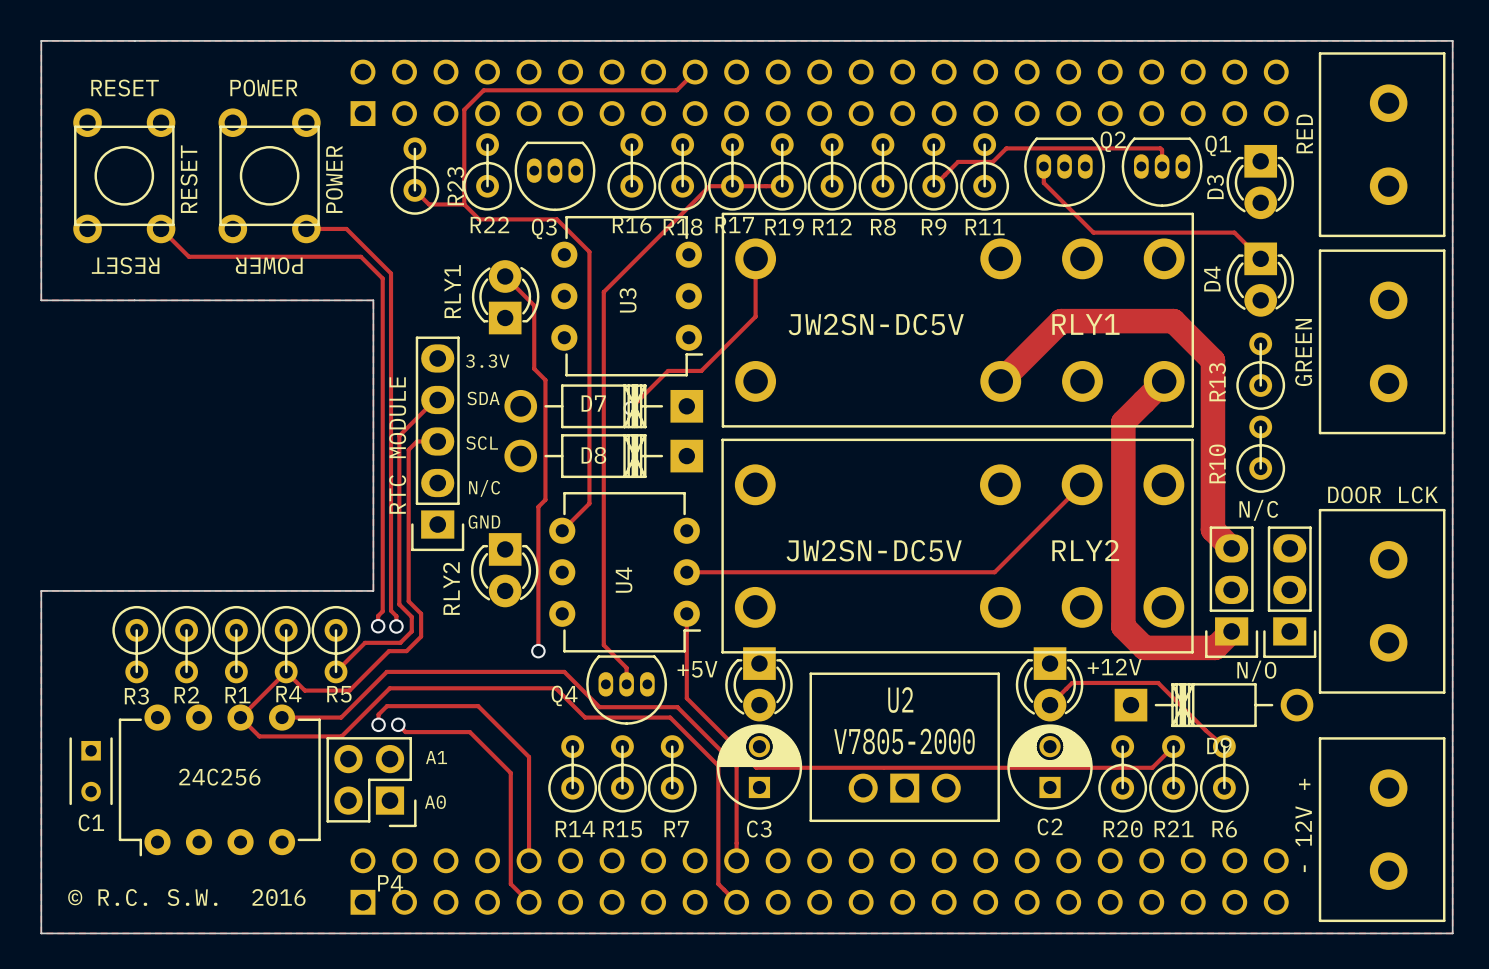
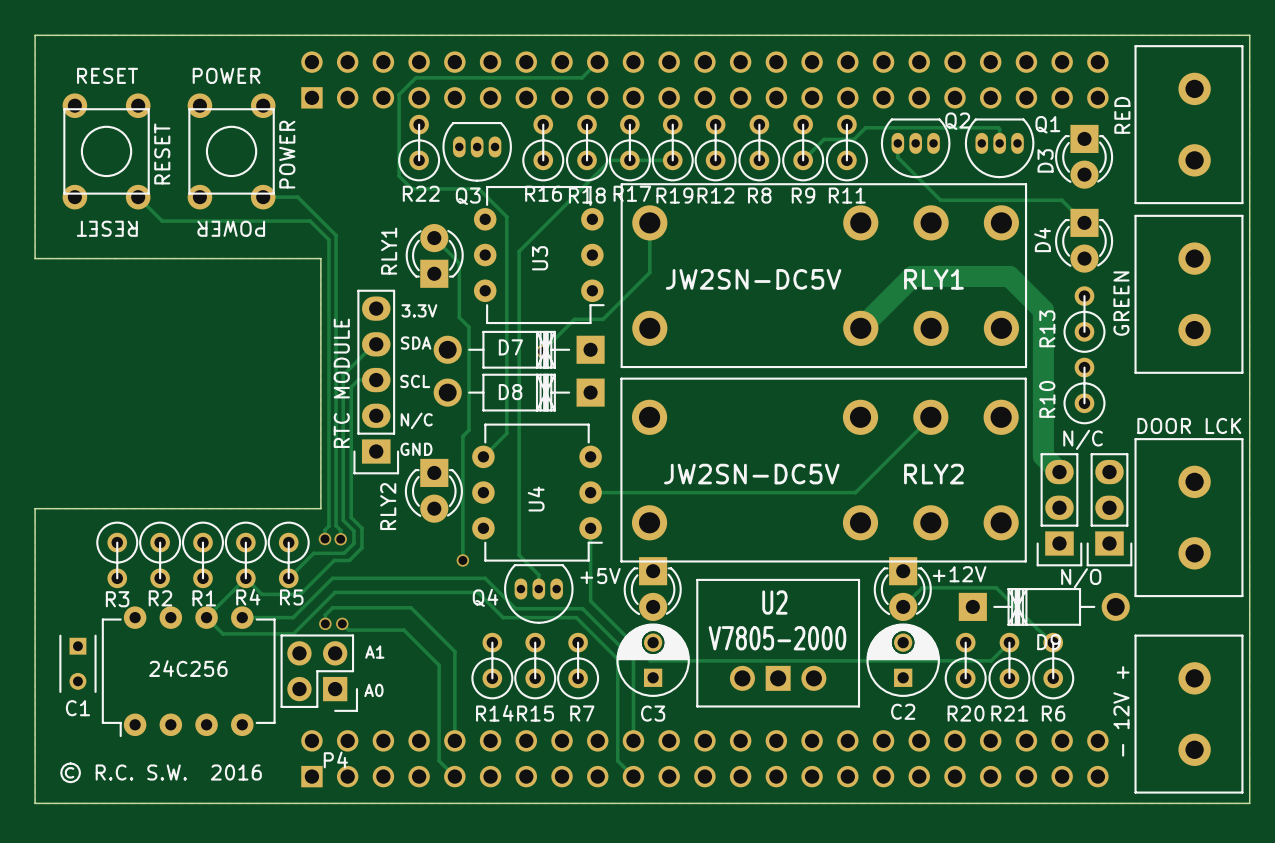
R23: (414, 176) -> none
track: (414, 190) (429, 204) (464, 204) -> none
track: (1164, 381) (1123, 422) (1123, 626) (1144, 647) (1215, 647) (1231, 631) -> none

